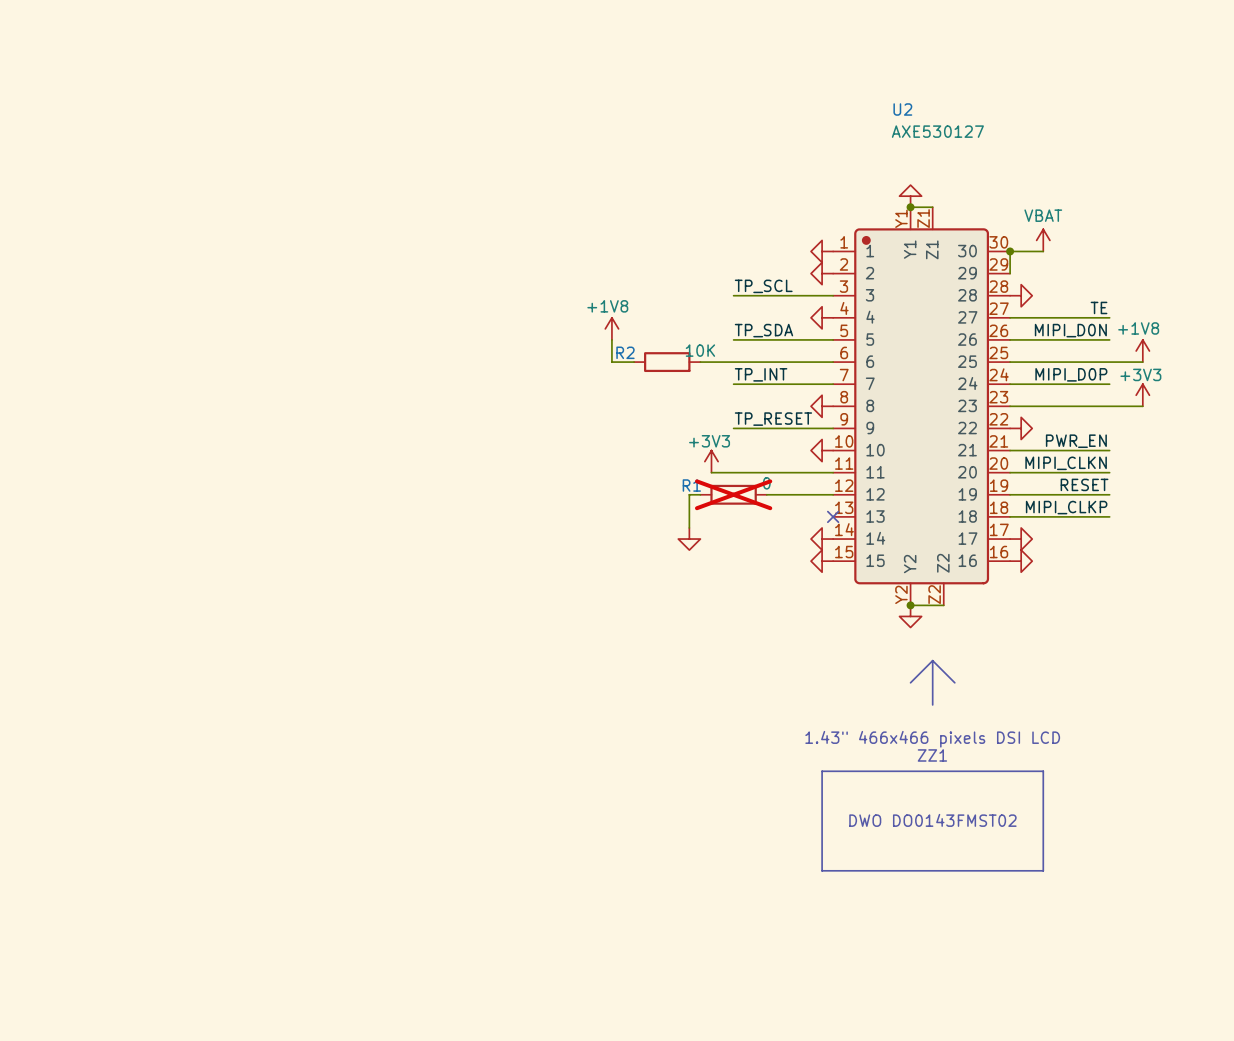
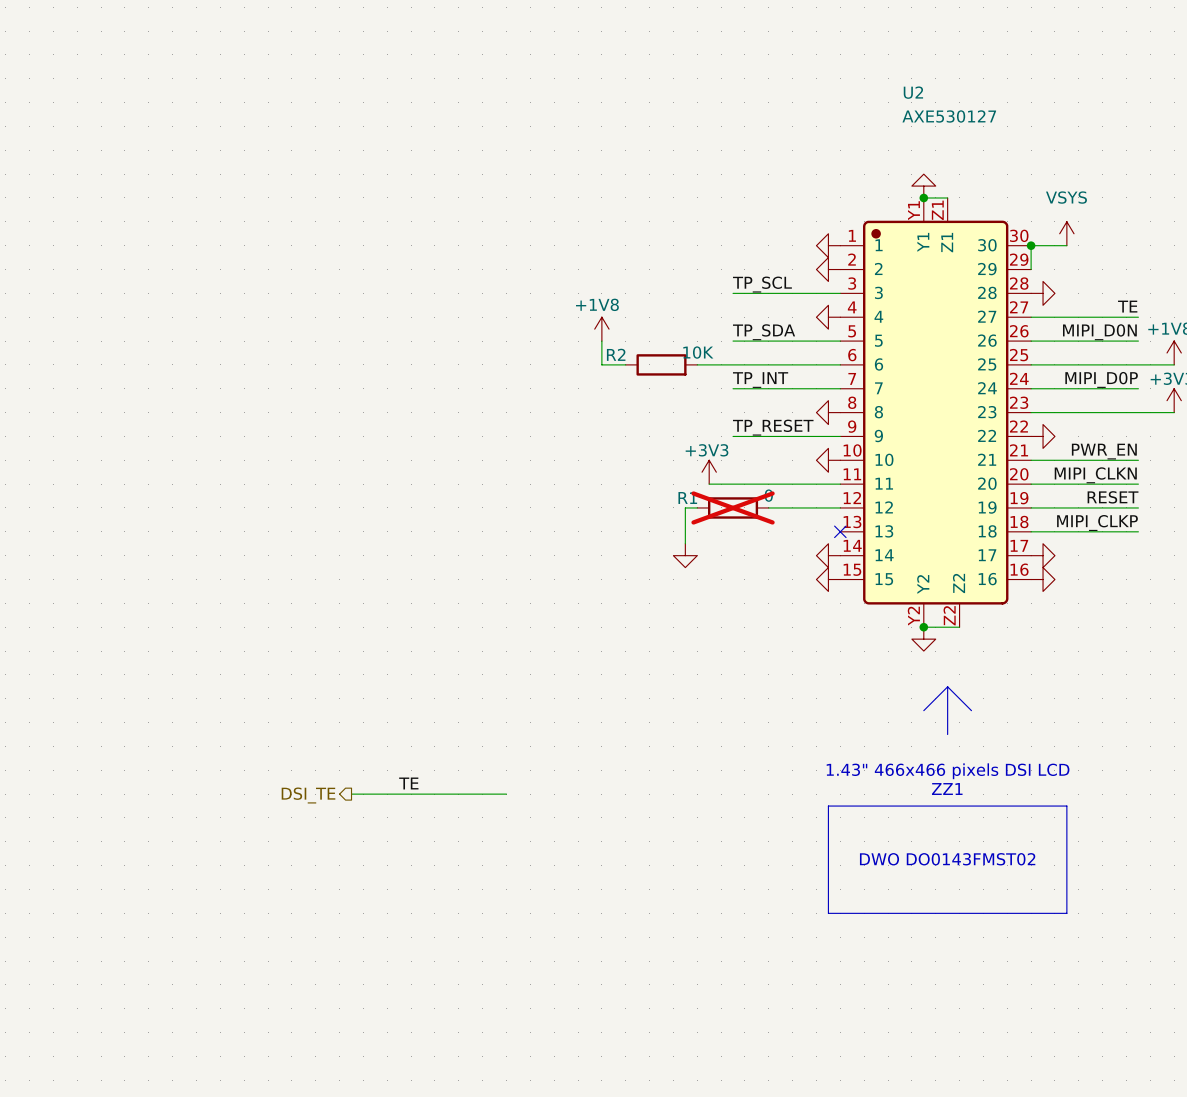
power symbol: VBAT (1043, 240) -> VSYS (1066, 233)
label: none -> TE (408, 783)
hierarchical label: none -> DSI_TE (308, 795)
wire: none -> (351, 794) (506, 794)

